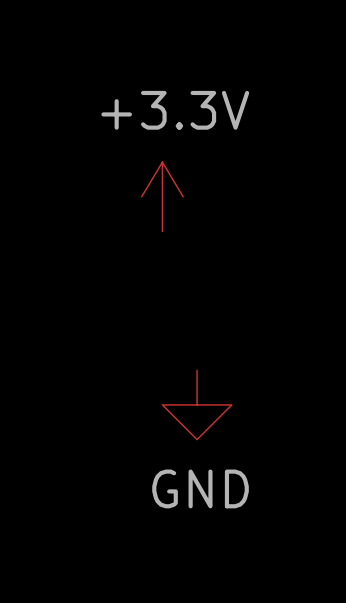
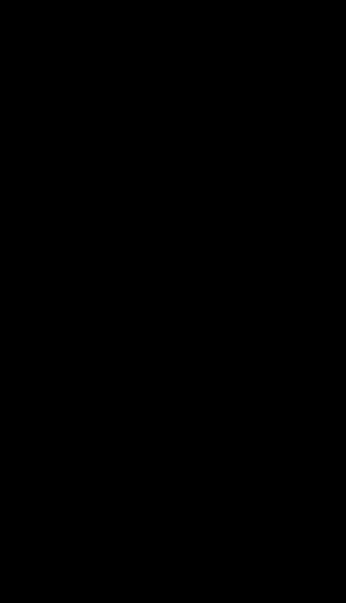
power symbol: +3.3V (162, 196) -> none
power symbol: GND (197, 404) -> none

